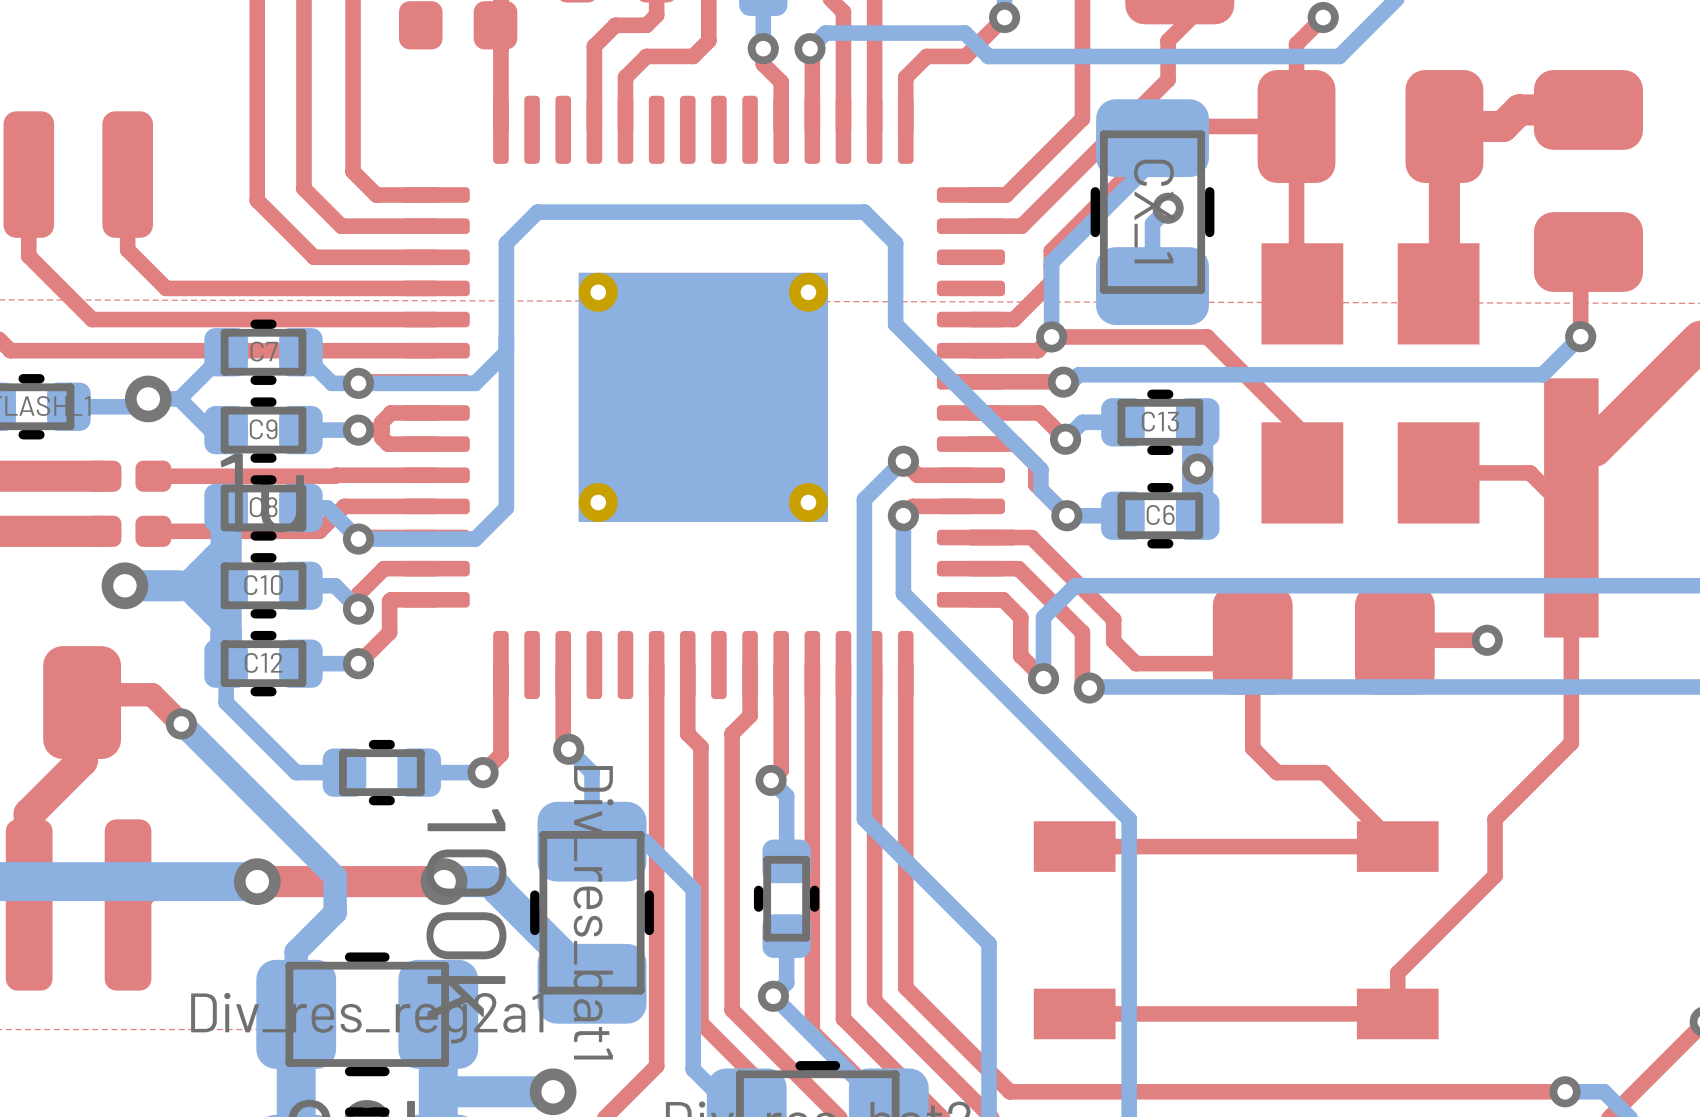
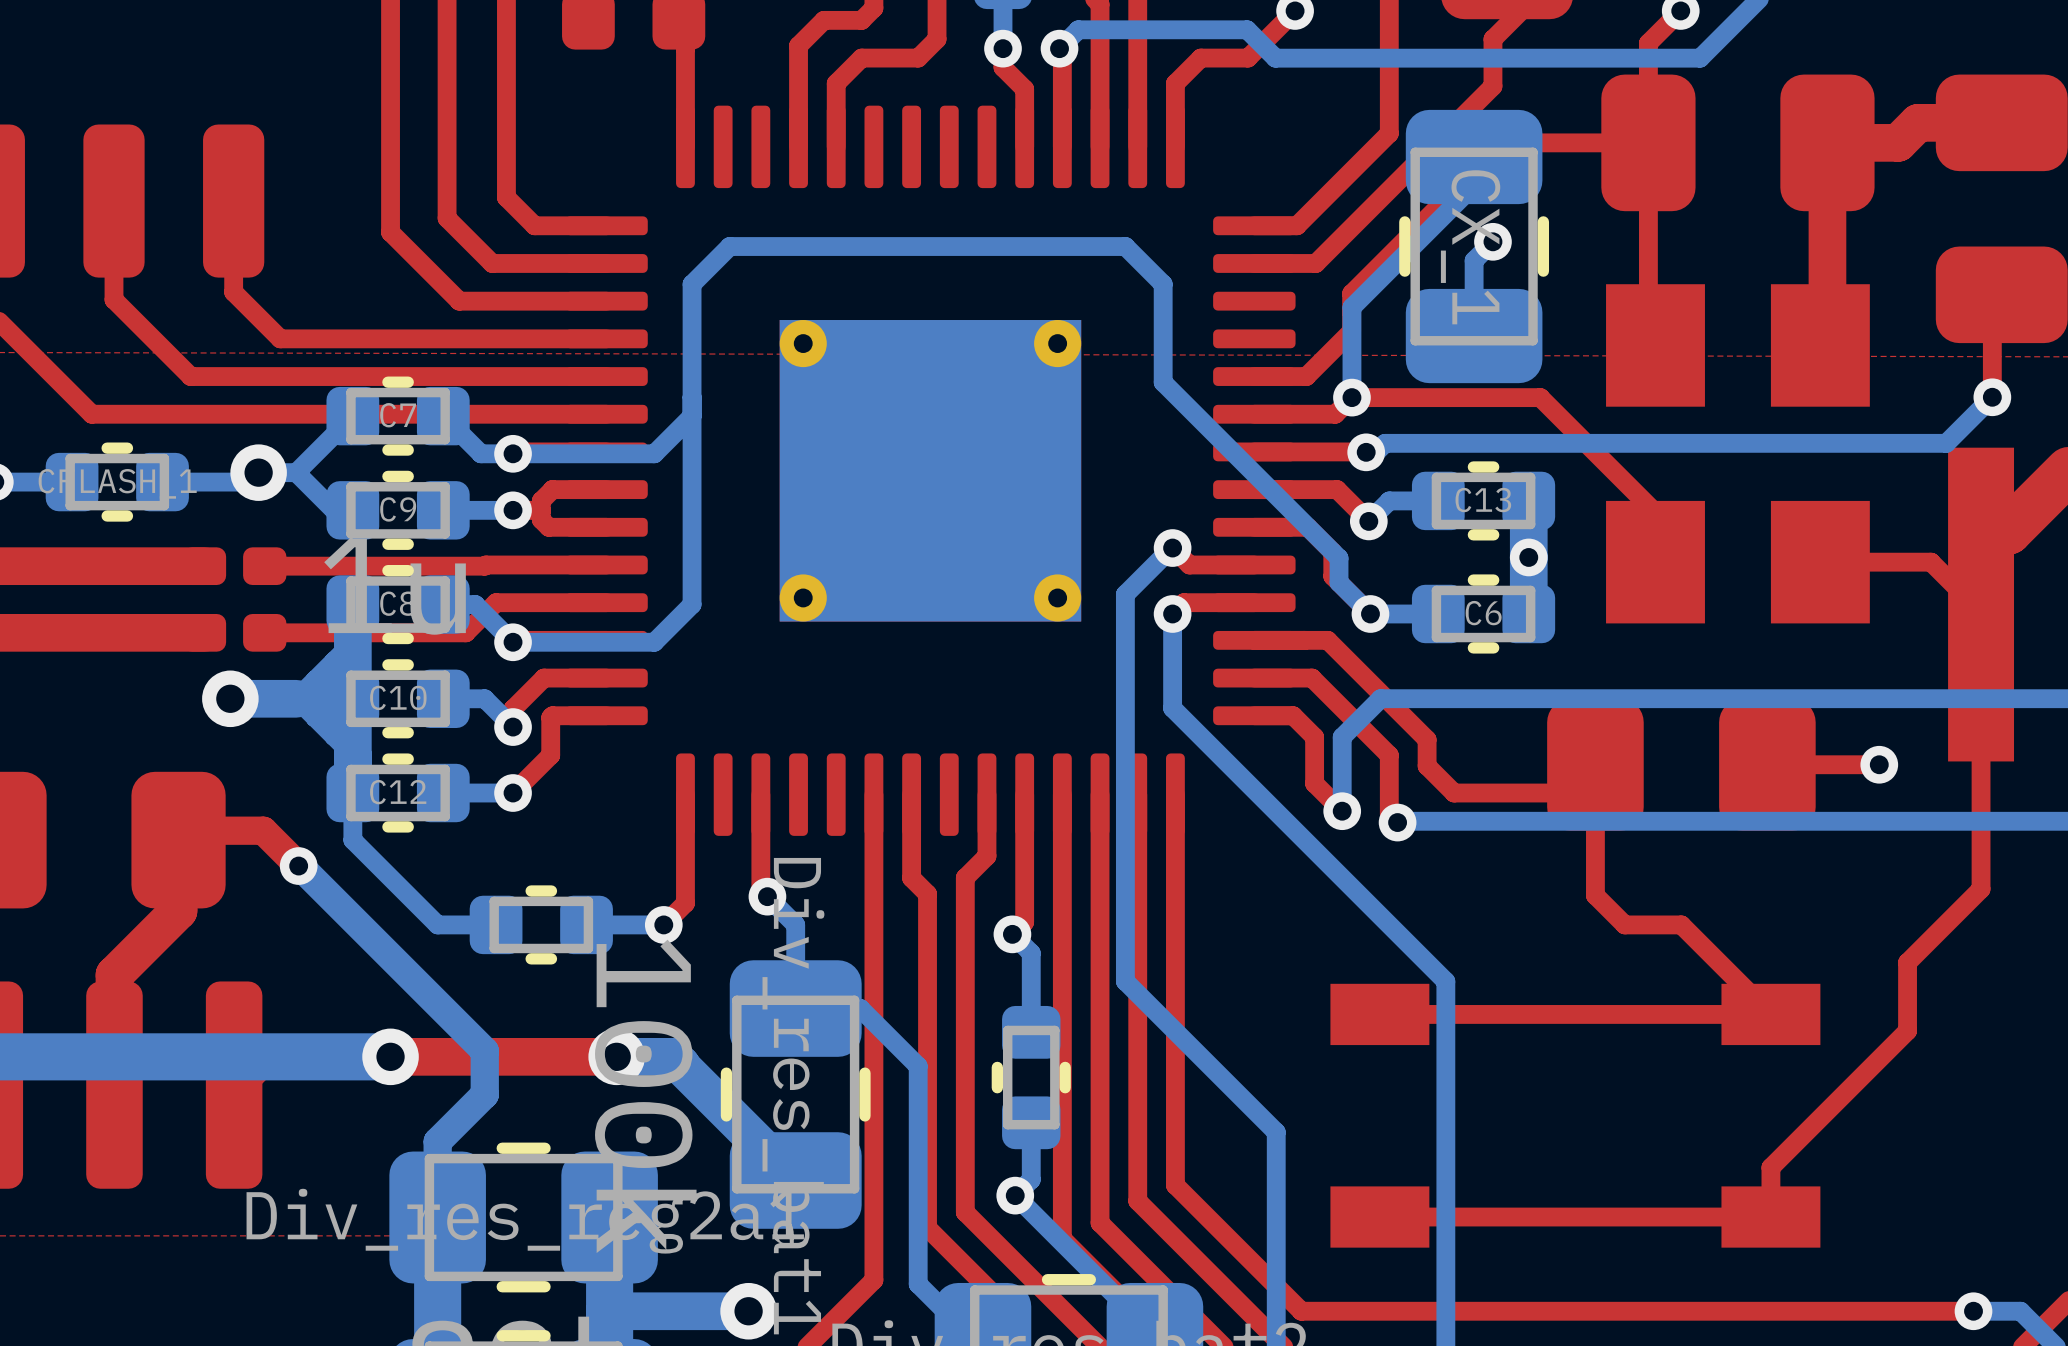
top track: (1510, 803) (1495, 819) (1495, 875) -> (1907, 962) (1907, 1030) (1888, 1049)

